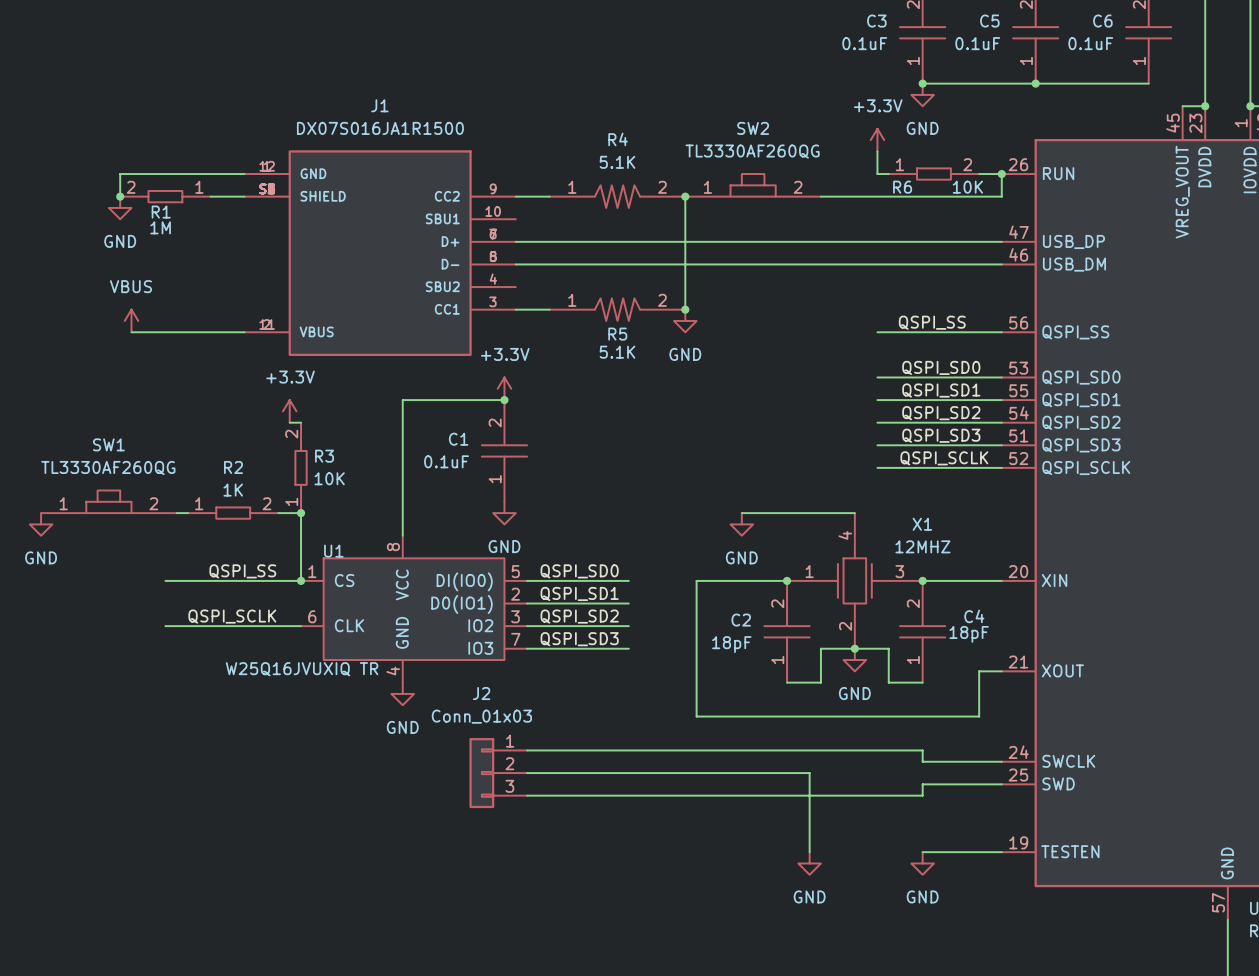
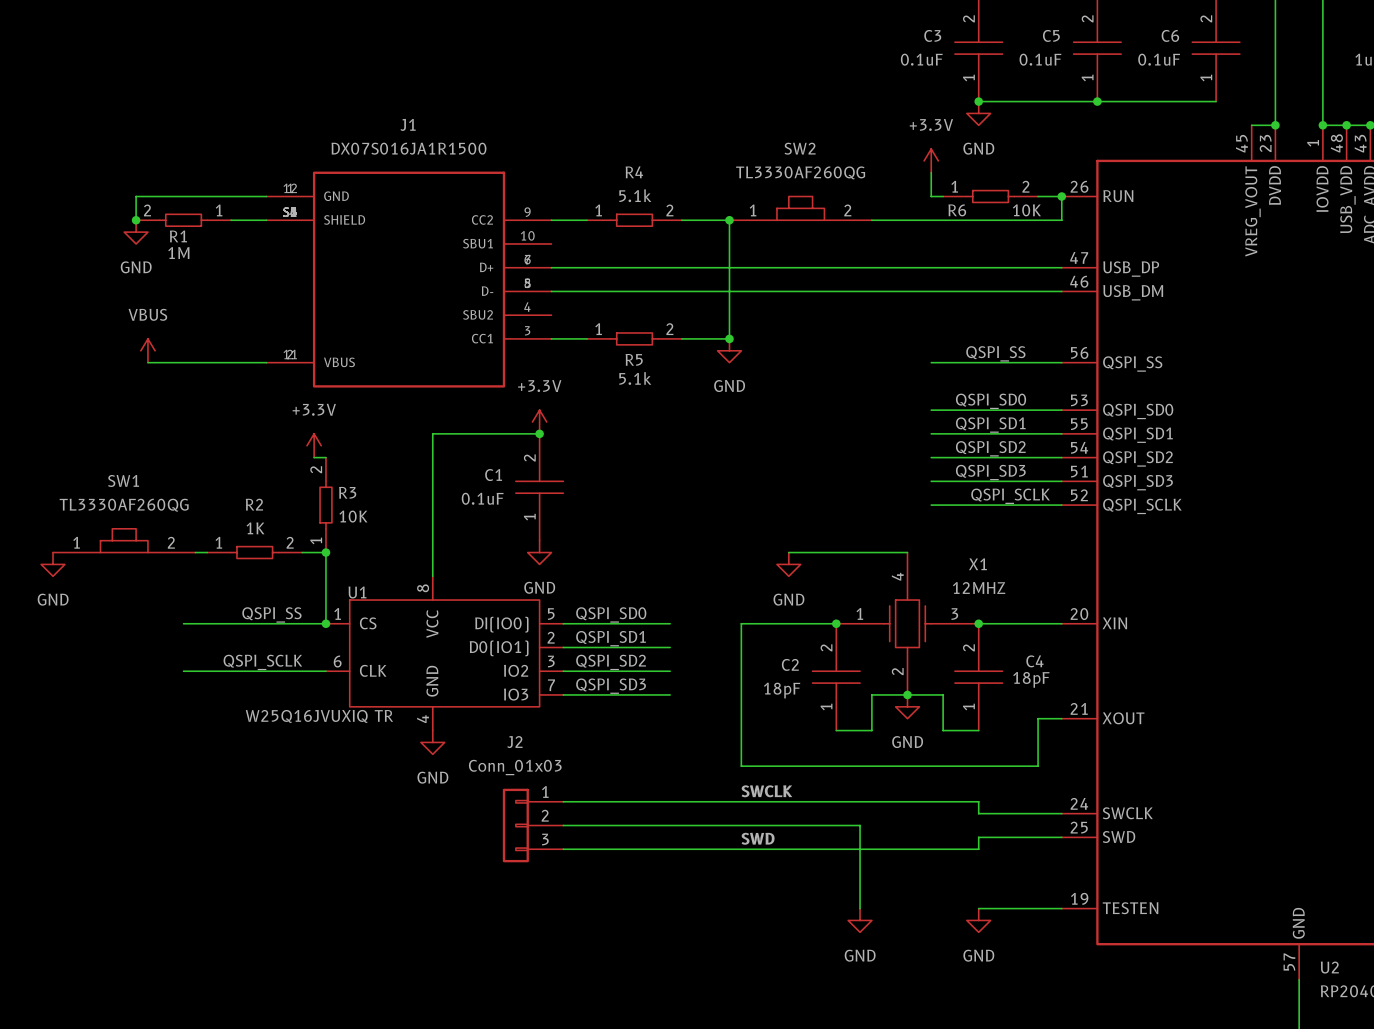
R4 text: 5.1K (617, 162) -> 5.1k (635, 195)
R4 symbol: [549, 185, 686, 208] -> [587, 214, 683, 227]
R5 symbol: [549, 298, 686, 321] -> [587, 332, 683, 345]
R5 text: 5.1K (617, 352) -> 5.1k (635, 378)
label: none -> SWCLK (766, 791)
label: none -> SWD (758, 838)

